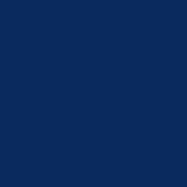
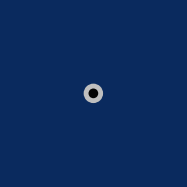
via: none -> (93, 93)

